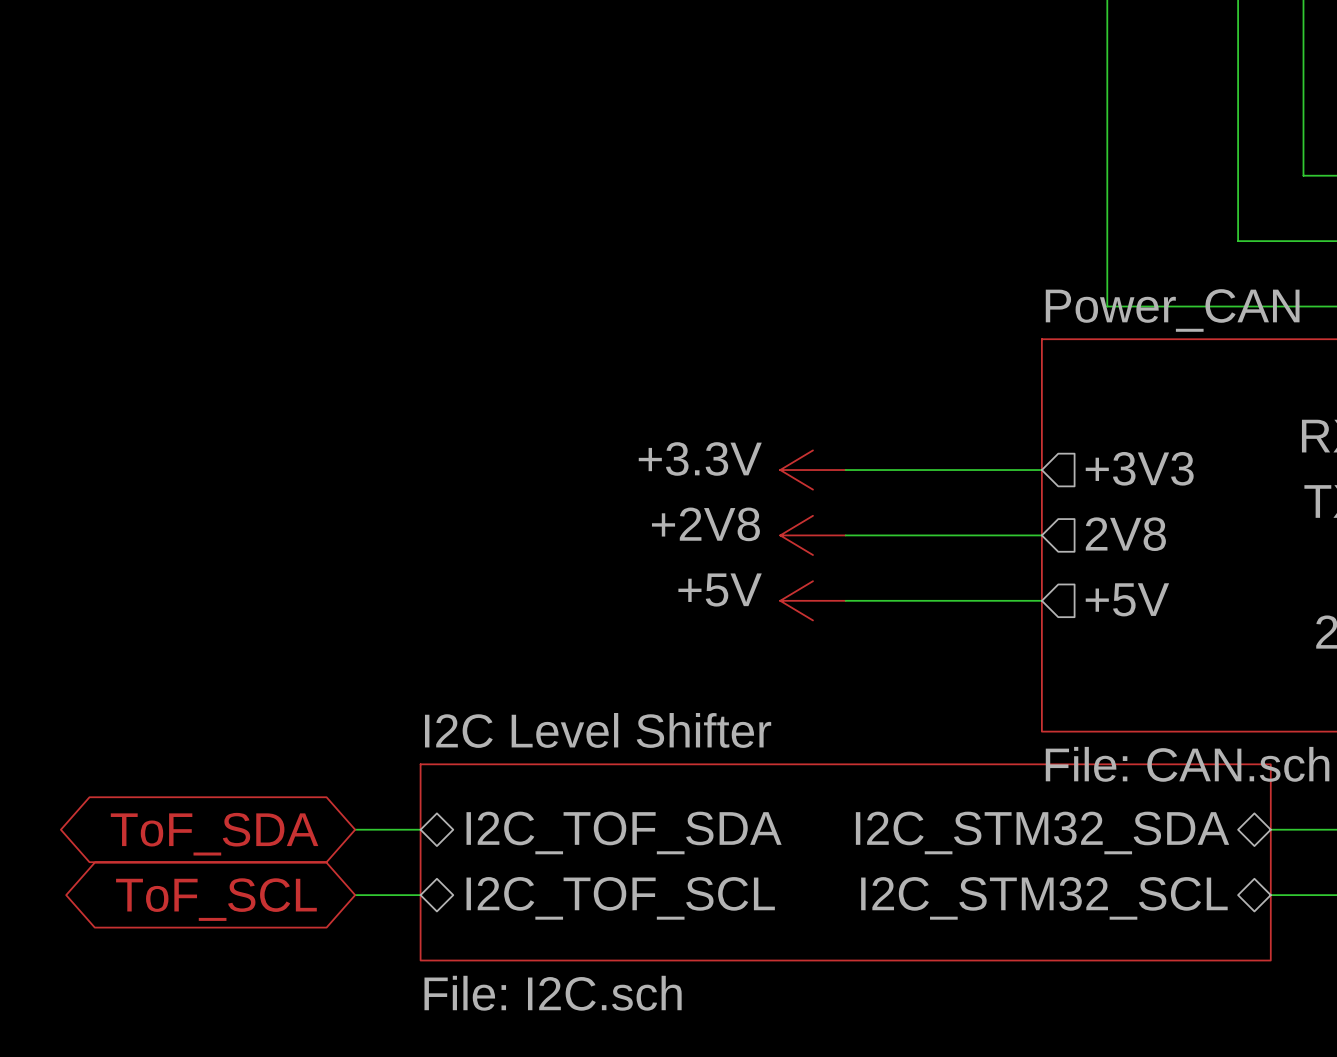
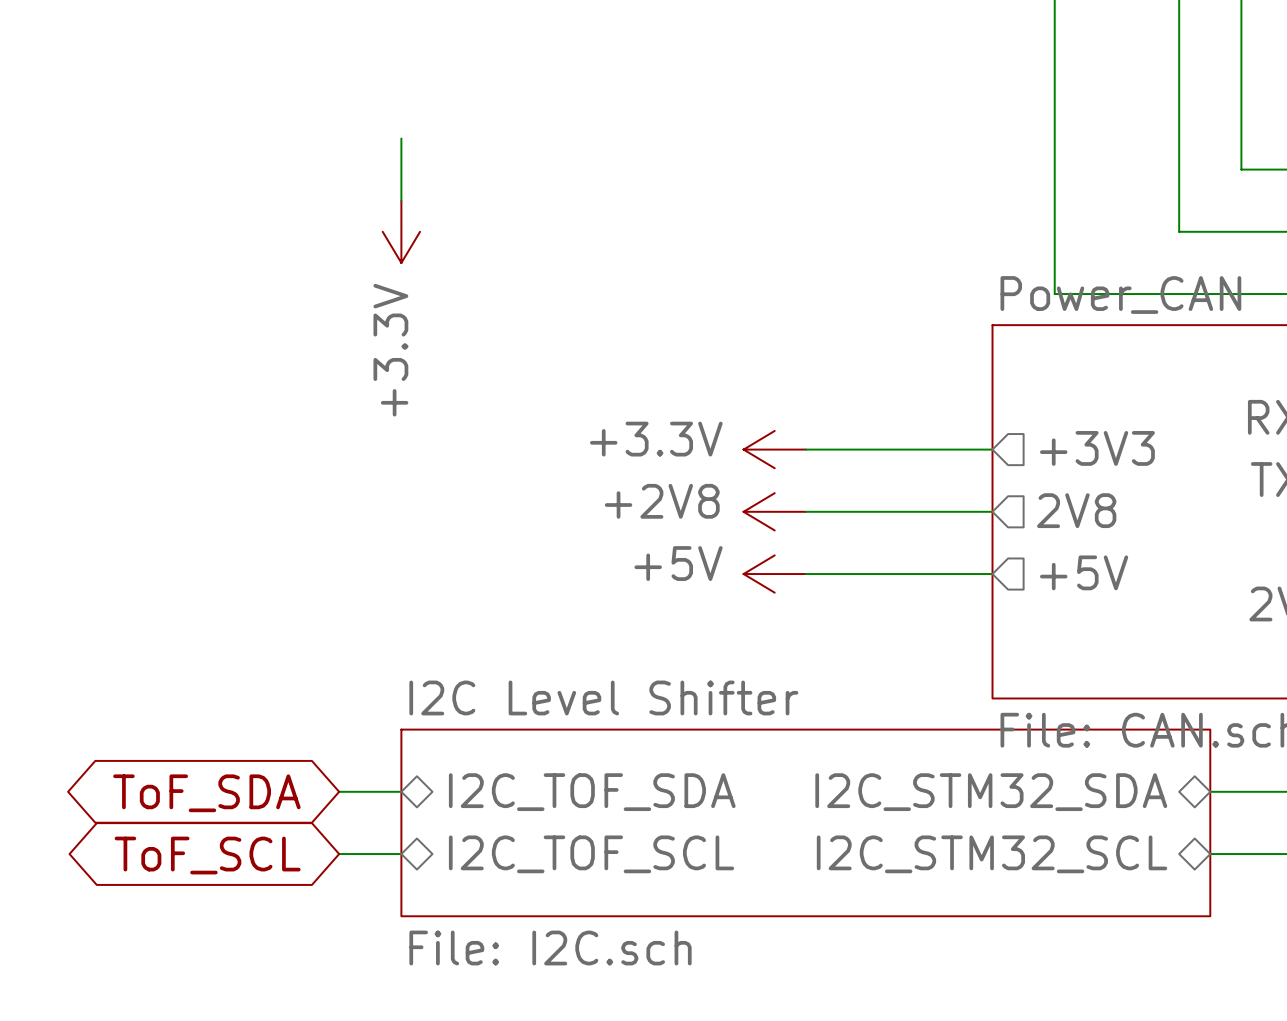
wire: none -> (401, 138) (401, 200)
power symbol: none -> +3.3V (401, 231)

